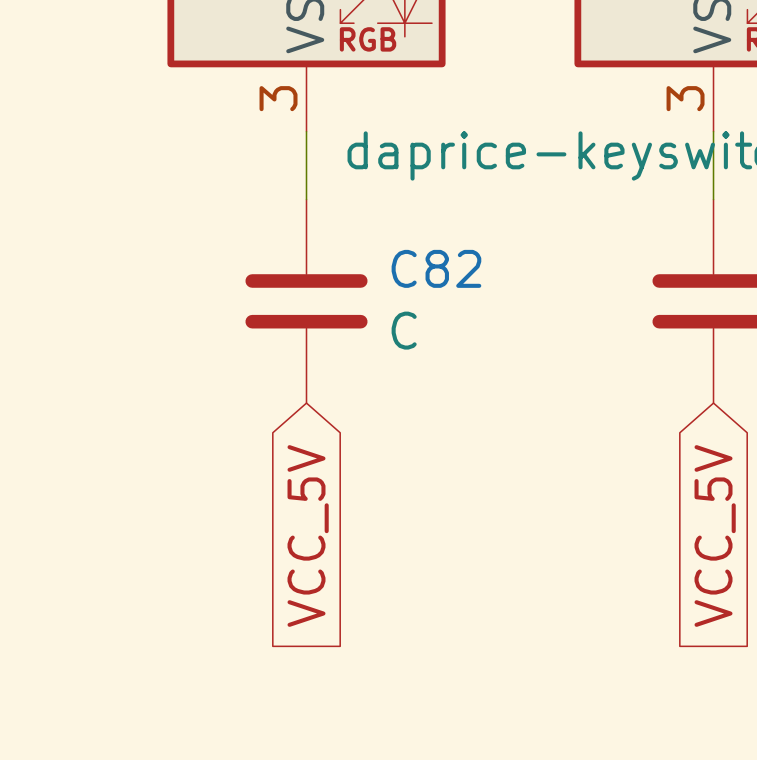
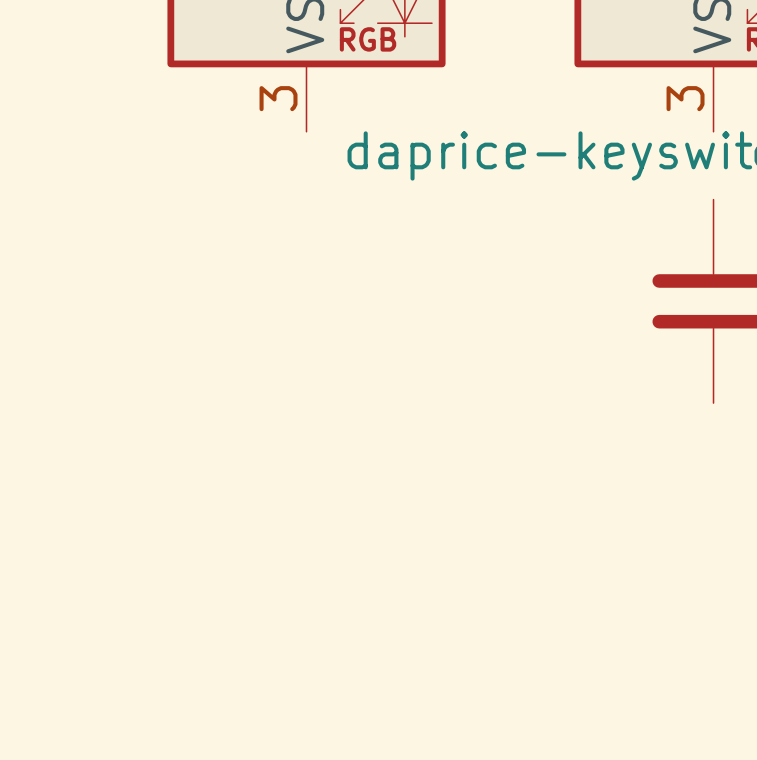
wire: (306, 131) (306, 199) -> none
wire: (713, 131) (713, 199) -> none
C82: C (306, 301) -> none
global label: VCC_5V (308, 535) -> none
global label: VCC_5V (715, 535) -> none

